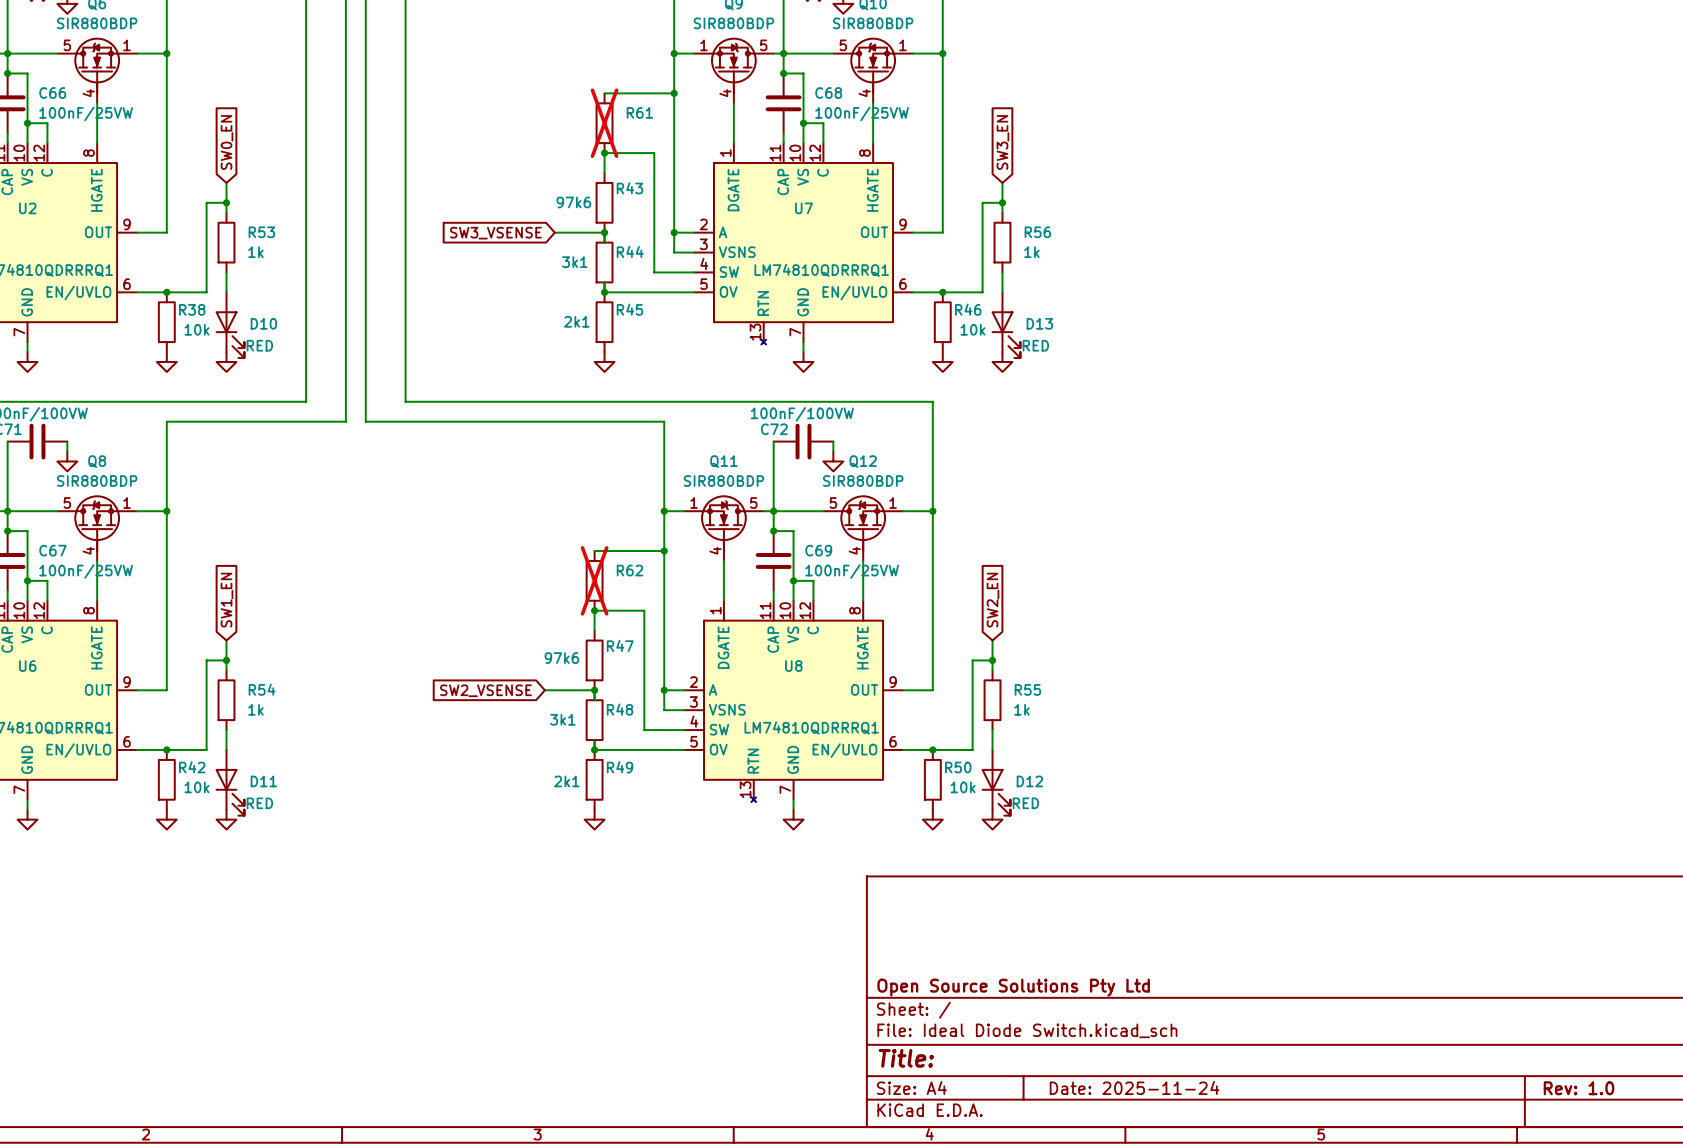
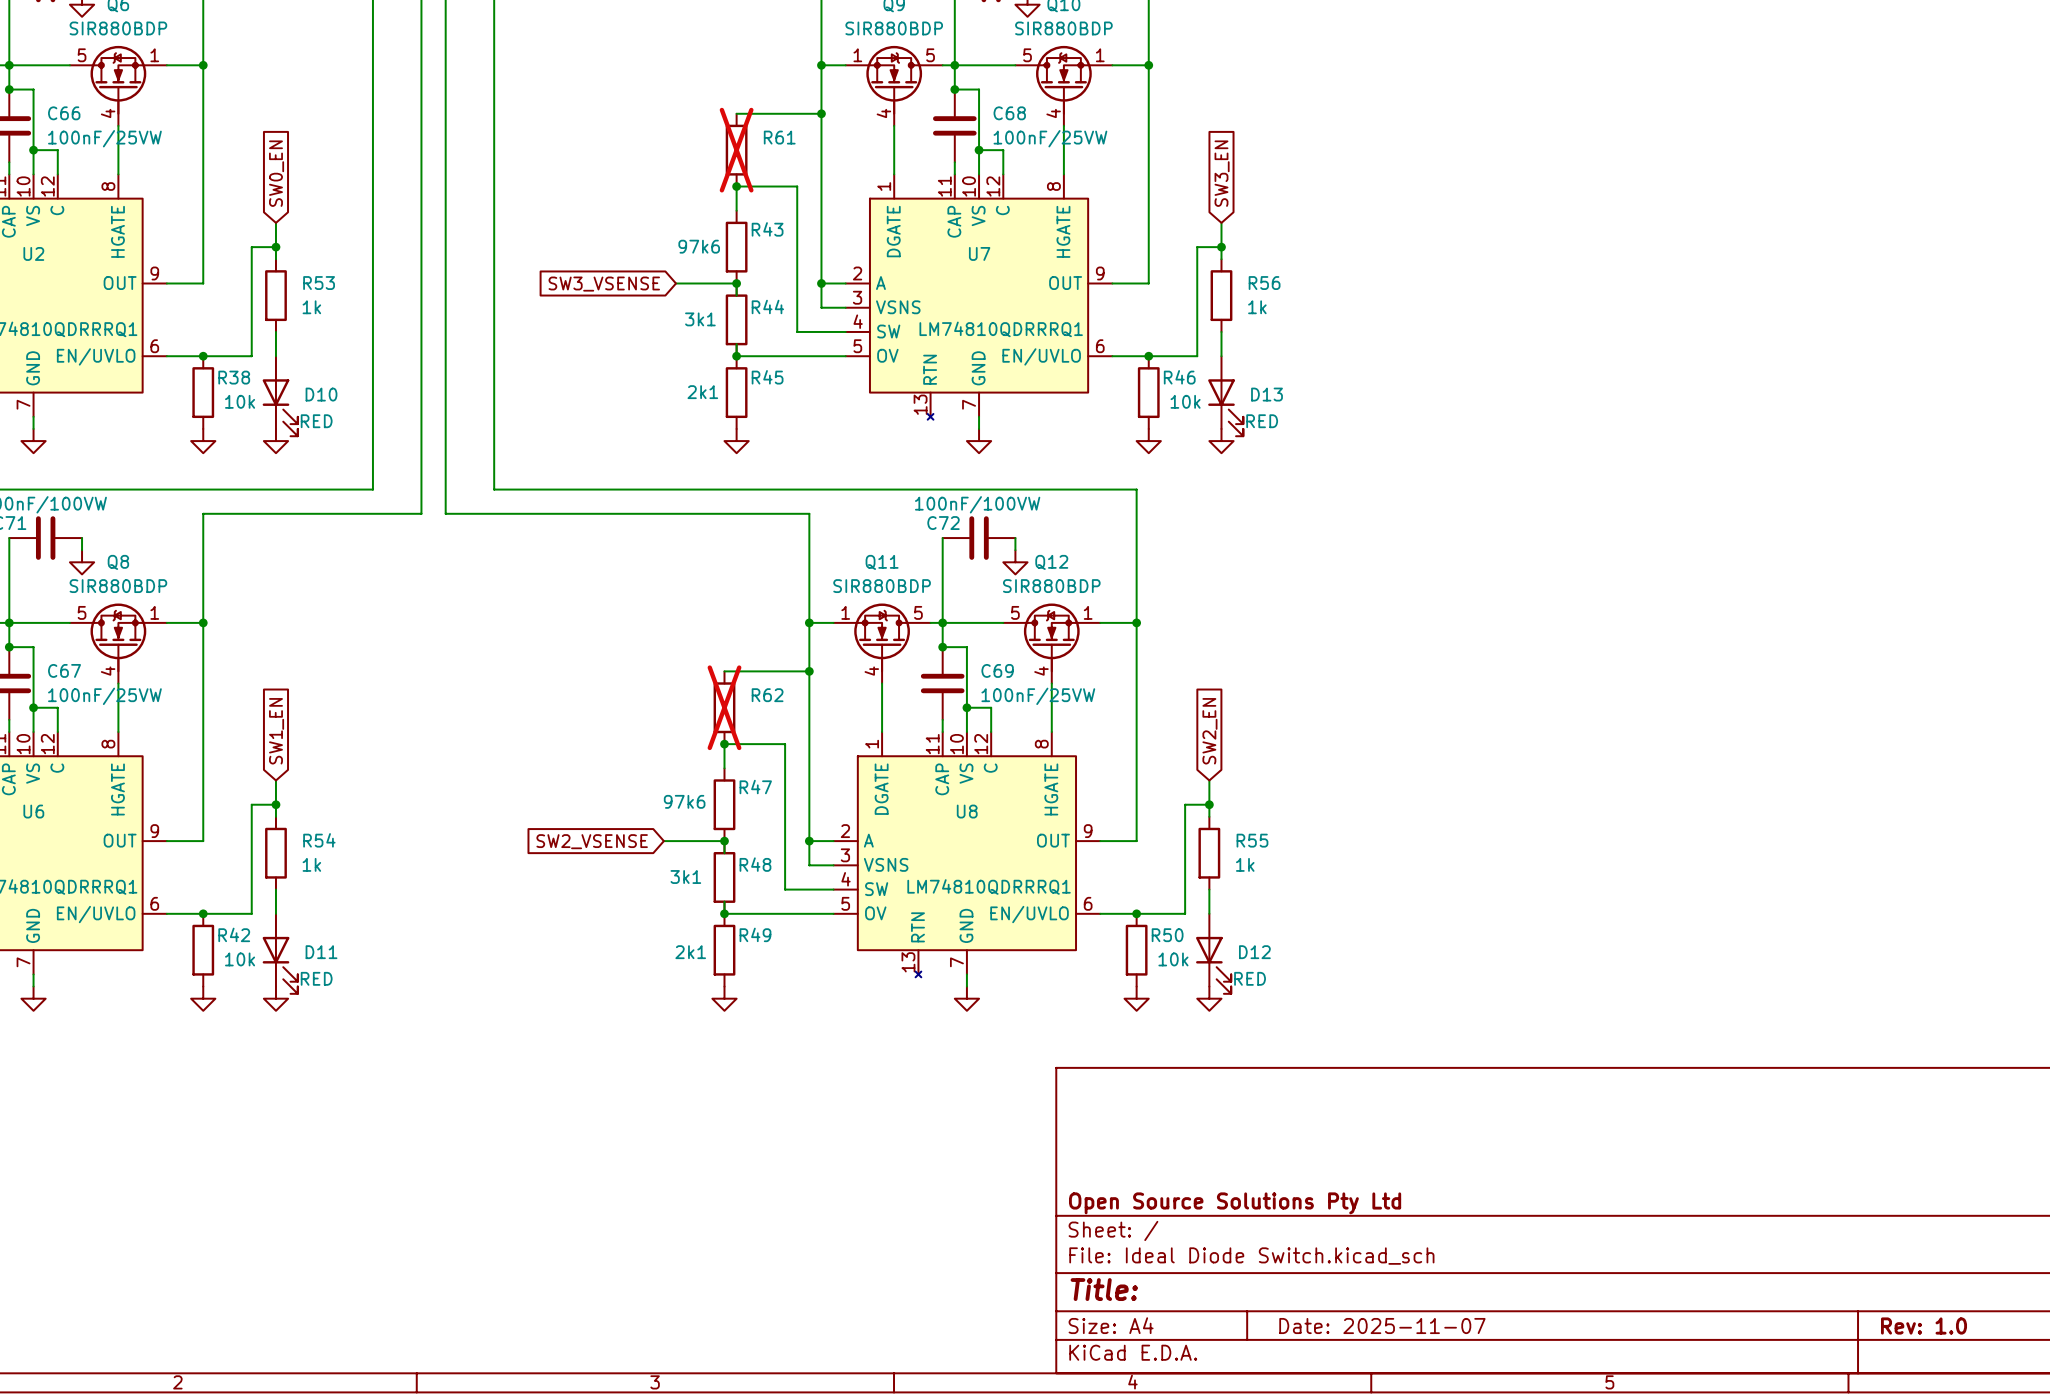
title block: Date: 2025-11-24 (1134, 1087) -> Date: 2025-11-07 (1382, 1326)

